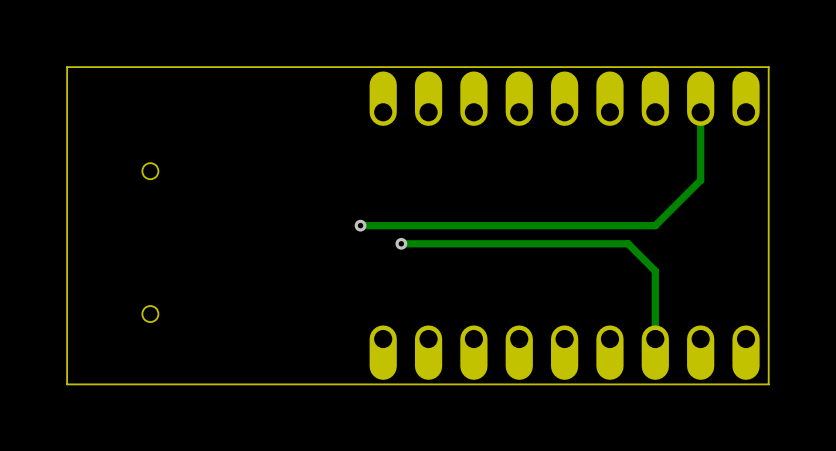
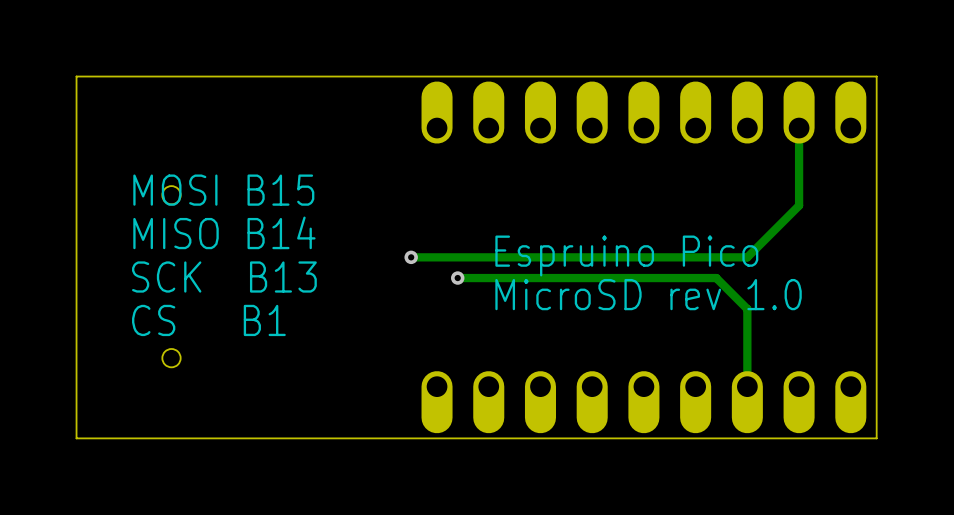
text: none -> MOSI B15 (223, 190)
text: none -> MISO B14 (224, 232)
text: none -> Espruino Pico (626, 255)
text: none -> SCK B13 (224, 277)
text: none -> MicroSD rev 1.0 (648, 294)
text: none -> CS B1 (208, 320)

